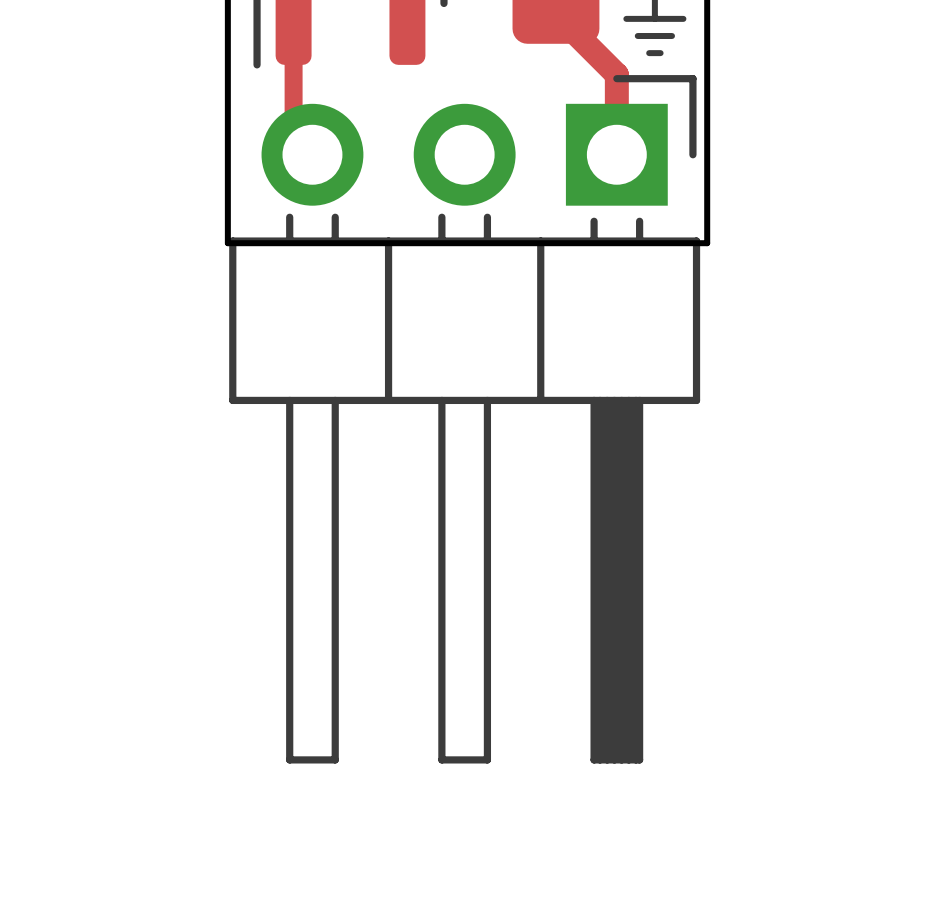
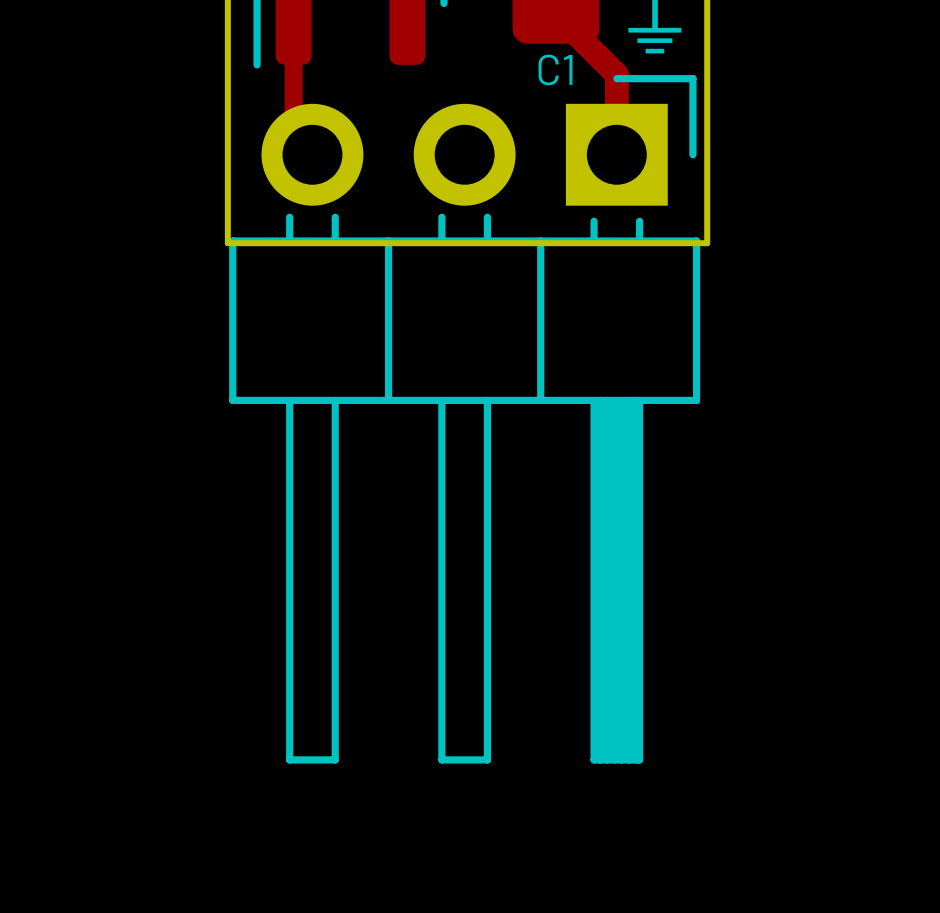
C1 name: none -> C1 (555, 69)

